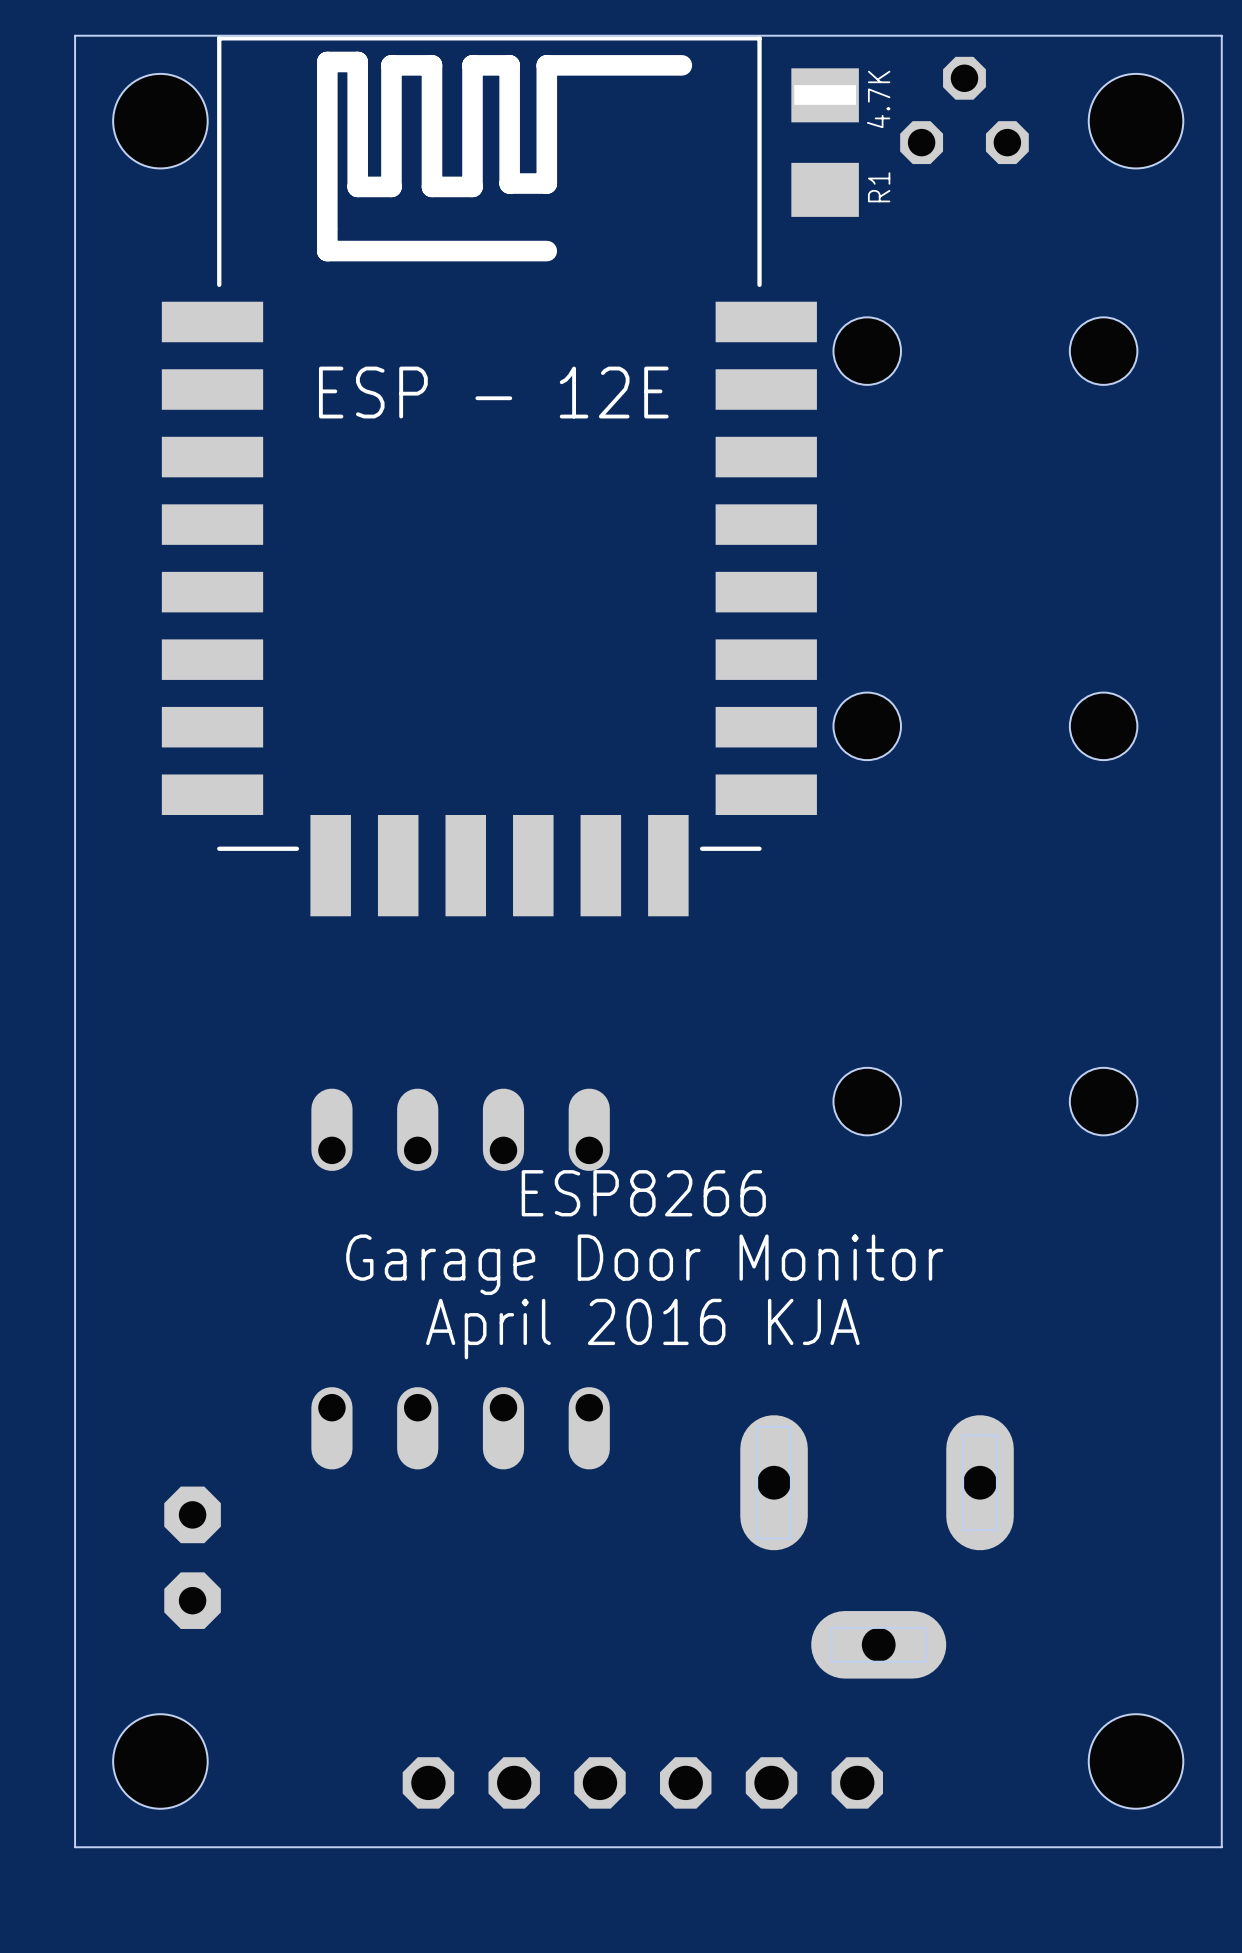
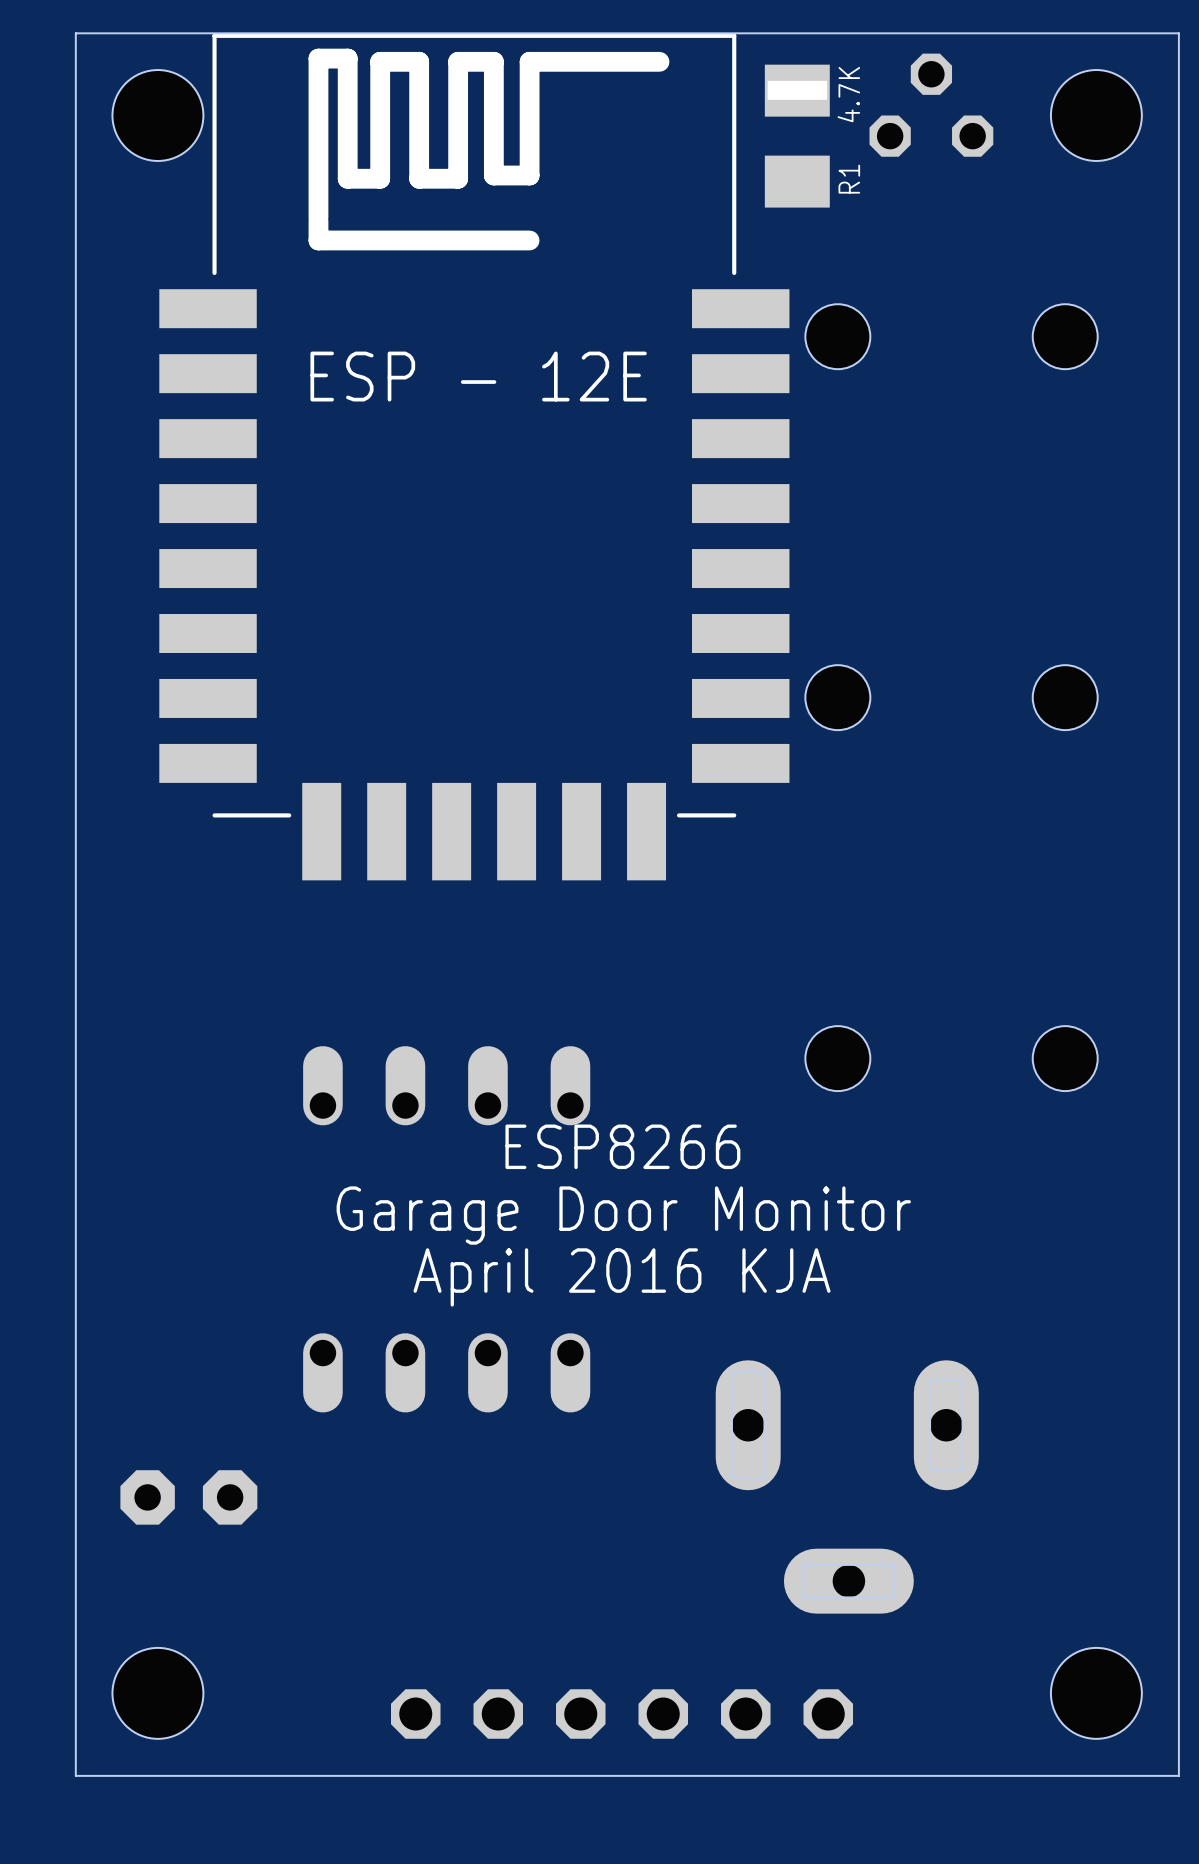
part rotation: 0° (192, 1557) -> 90° clockwise (188, 1497)

